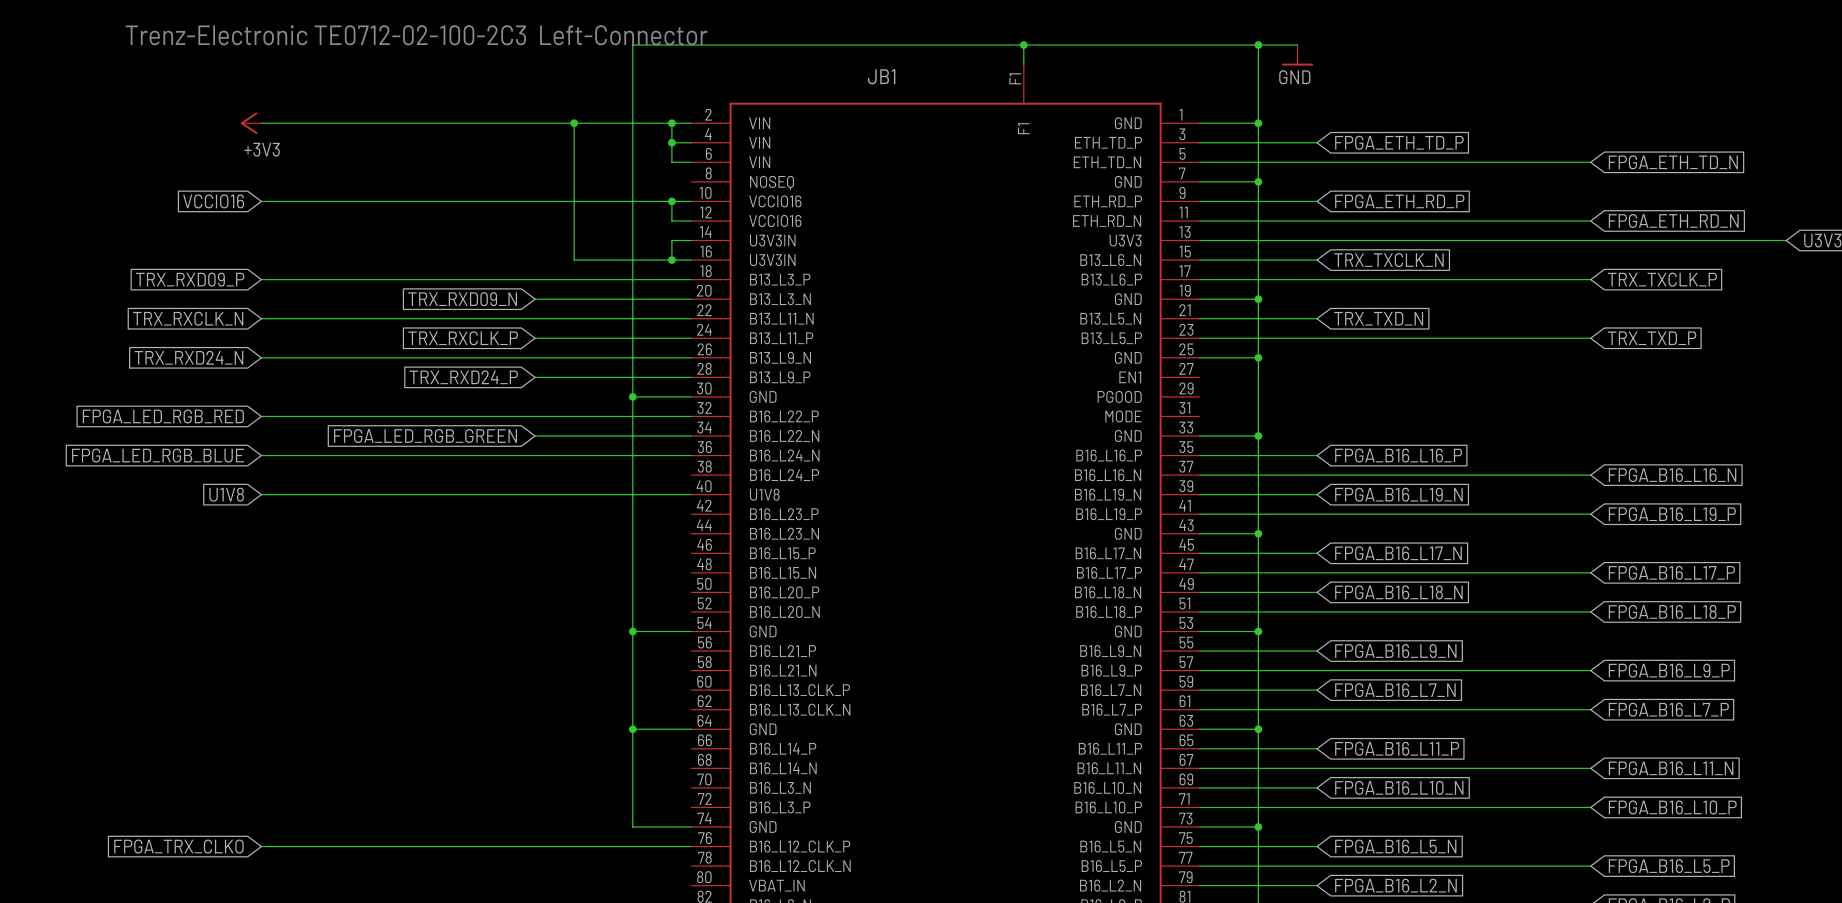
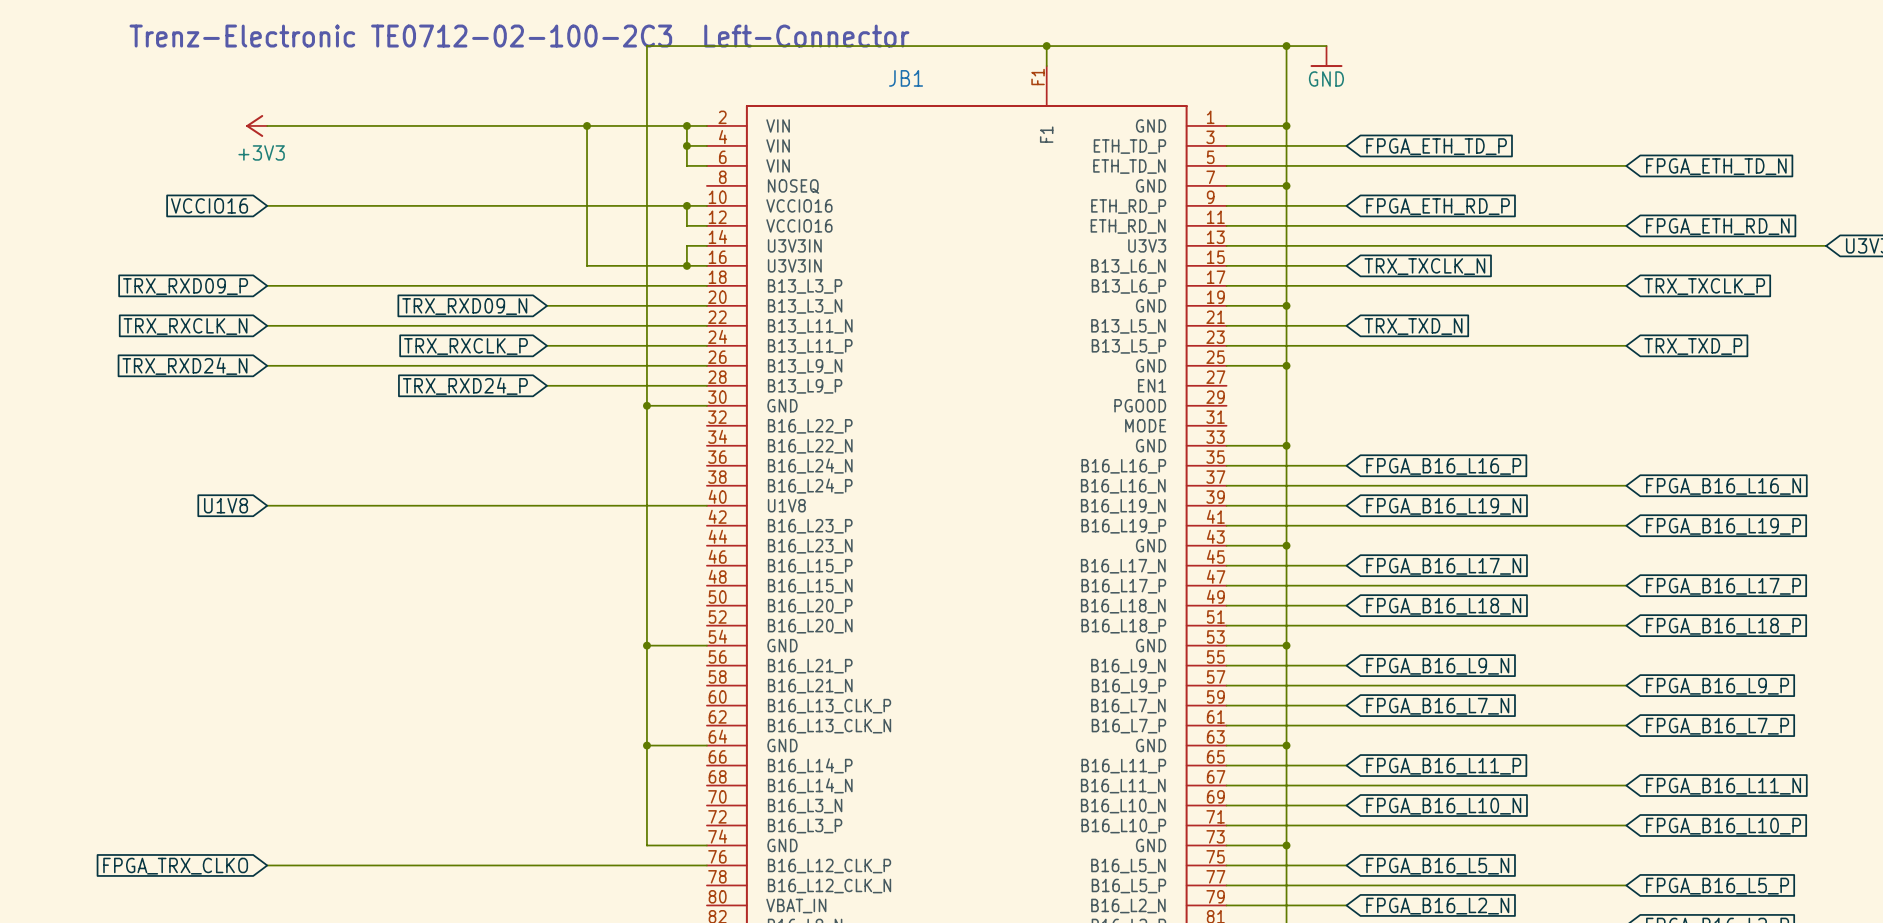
global label: FPGA_LED_RGB_RED (163, 416) -> none
wire: (261, 416) (691, 416) -> none
global label: FPGA_LED_RGB_GREEN (425, 436) -> none
wire: (535, 436) (691, 436) -> none
global label: FPGA_LED_RGB_BLUE (157, 455) -> none
wire: (261, 455) (691, 455) -> none

